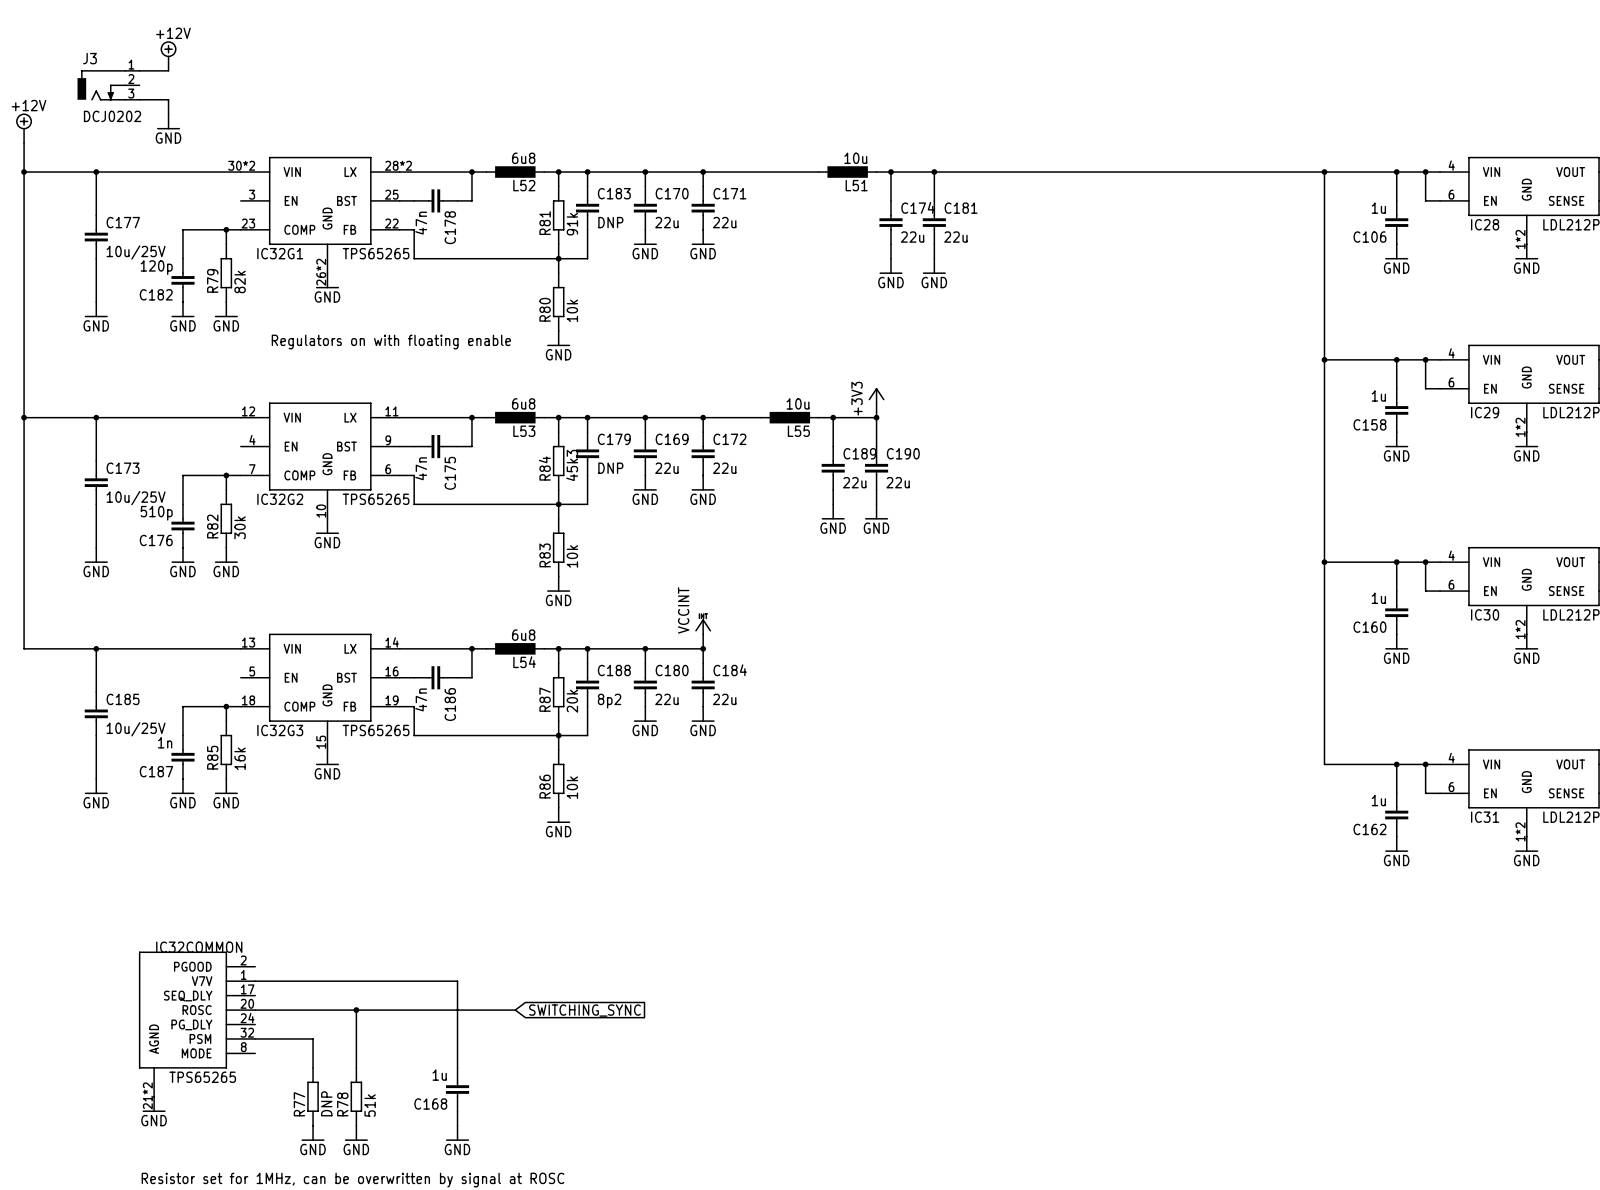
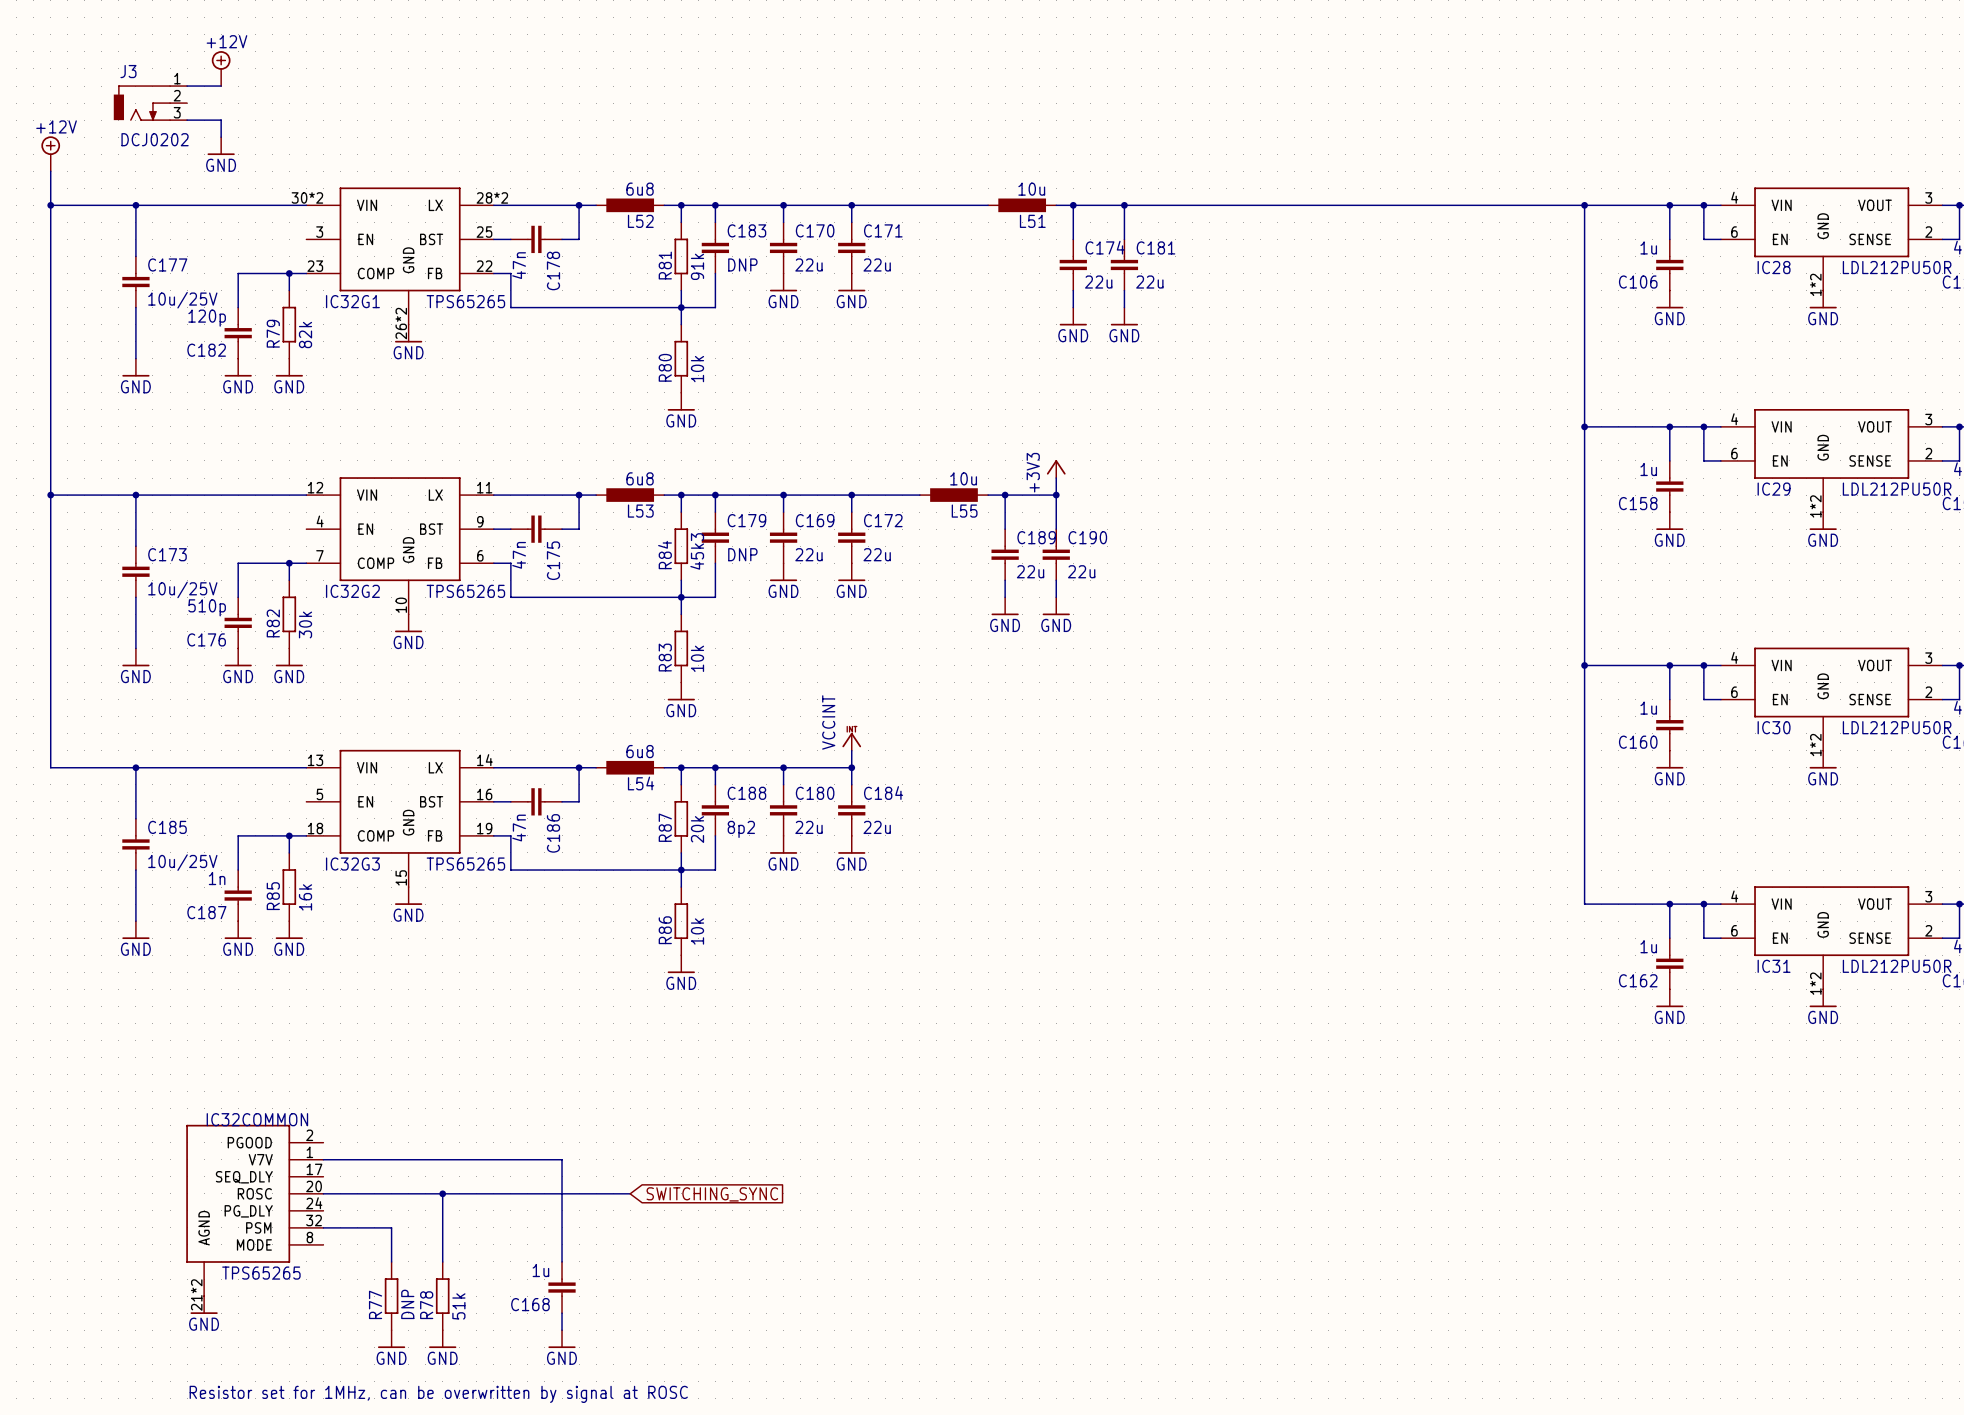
text: Regulators on with floating enable (391, 342) -> none

